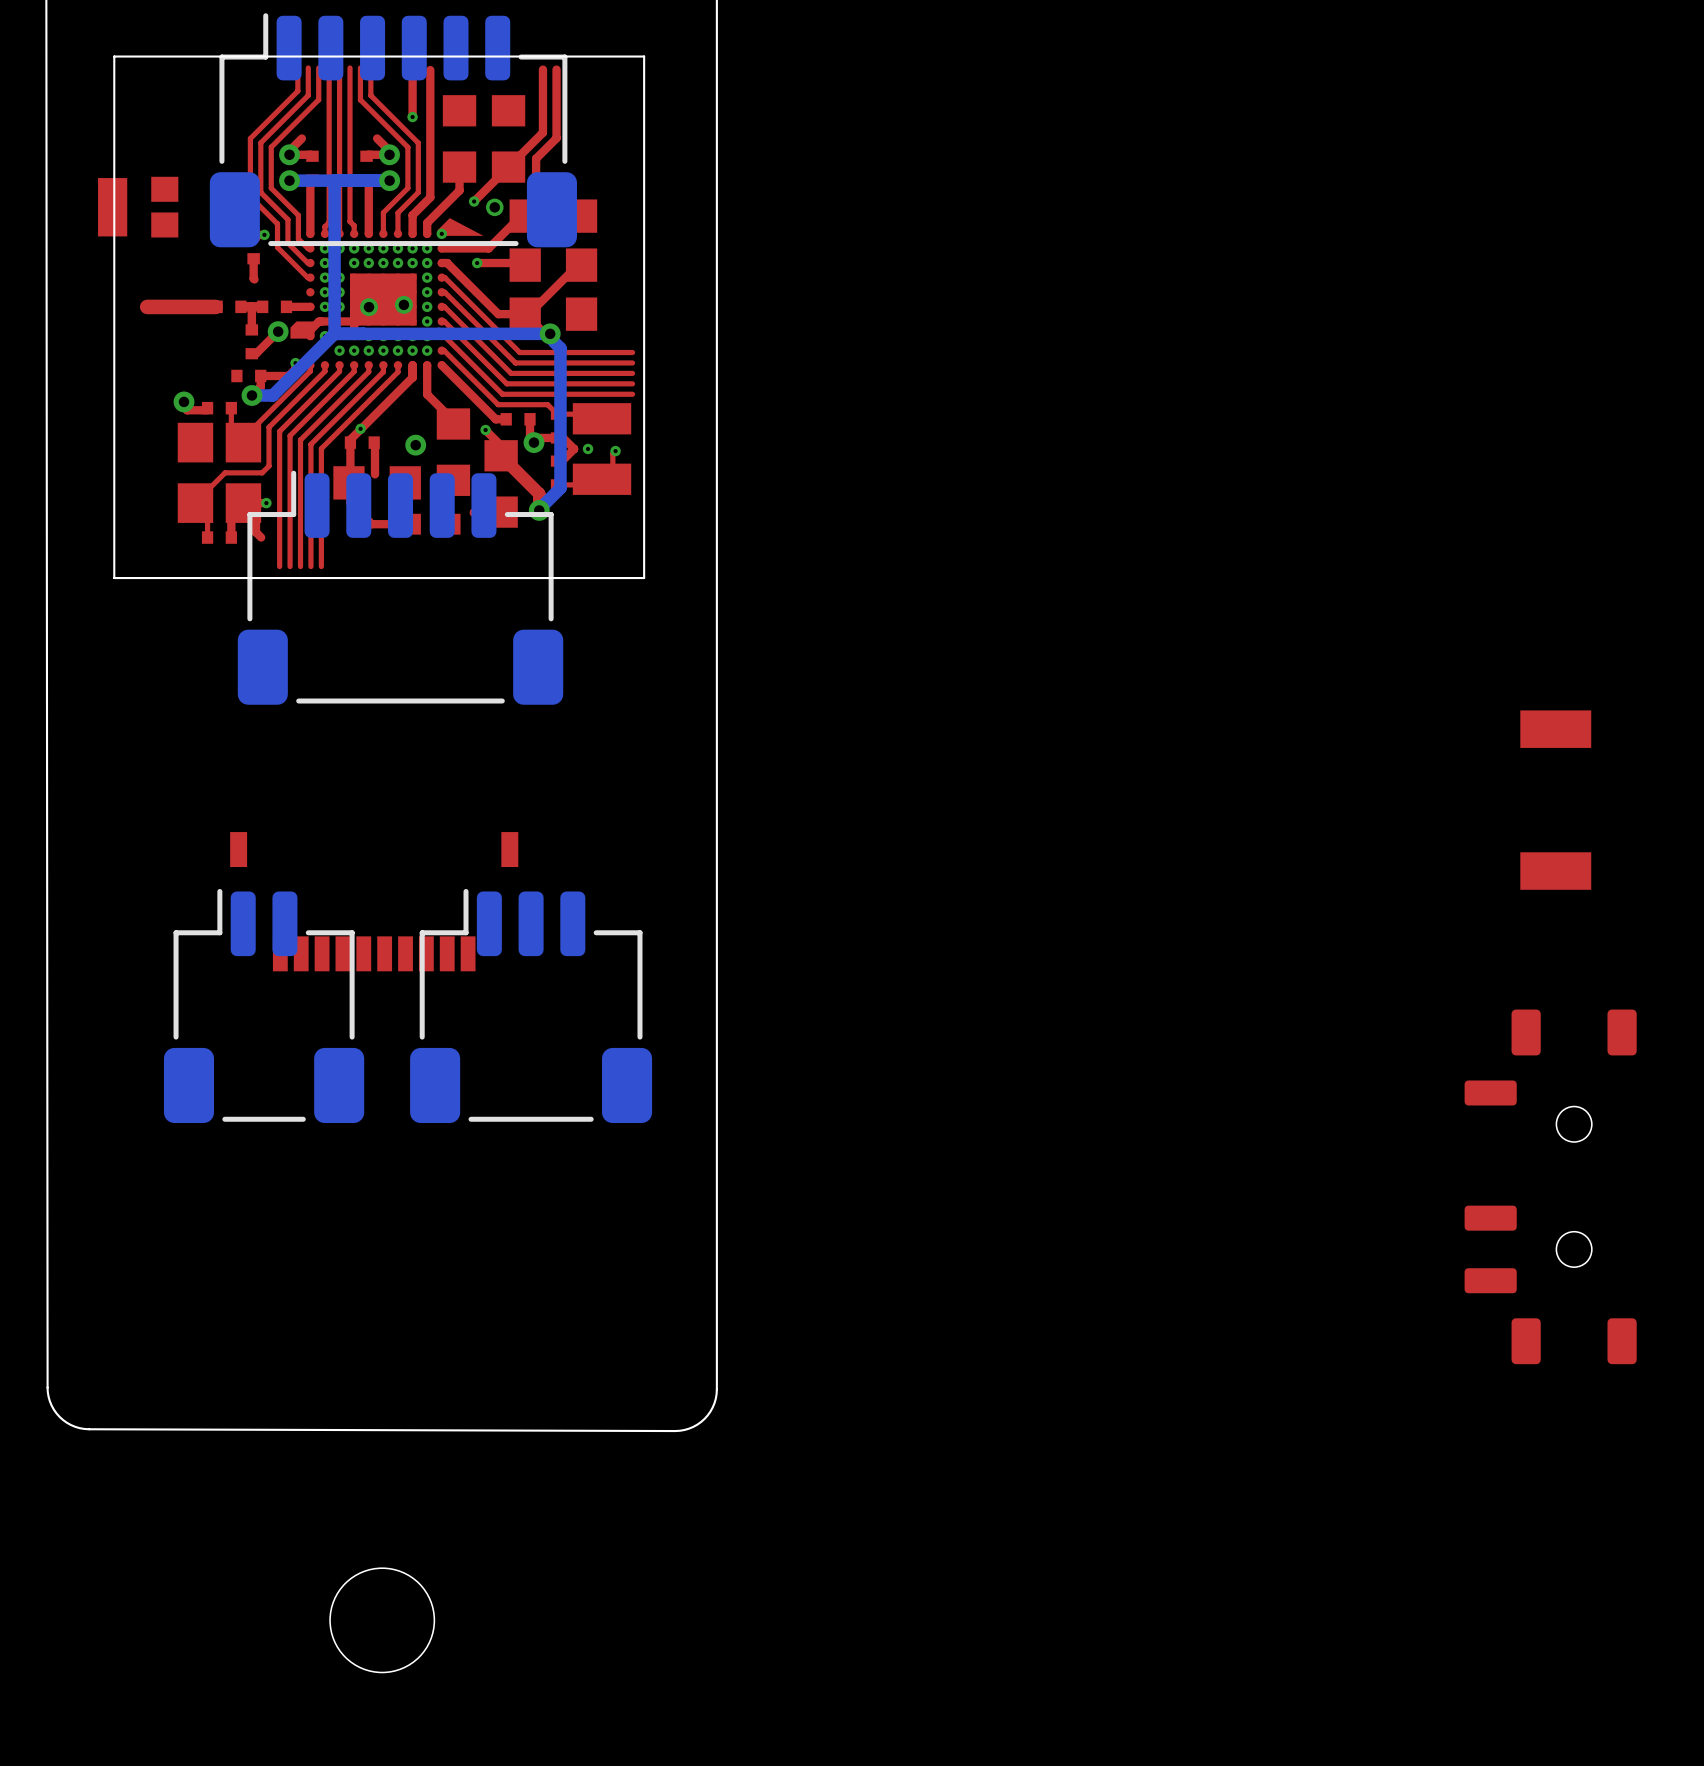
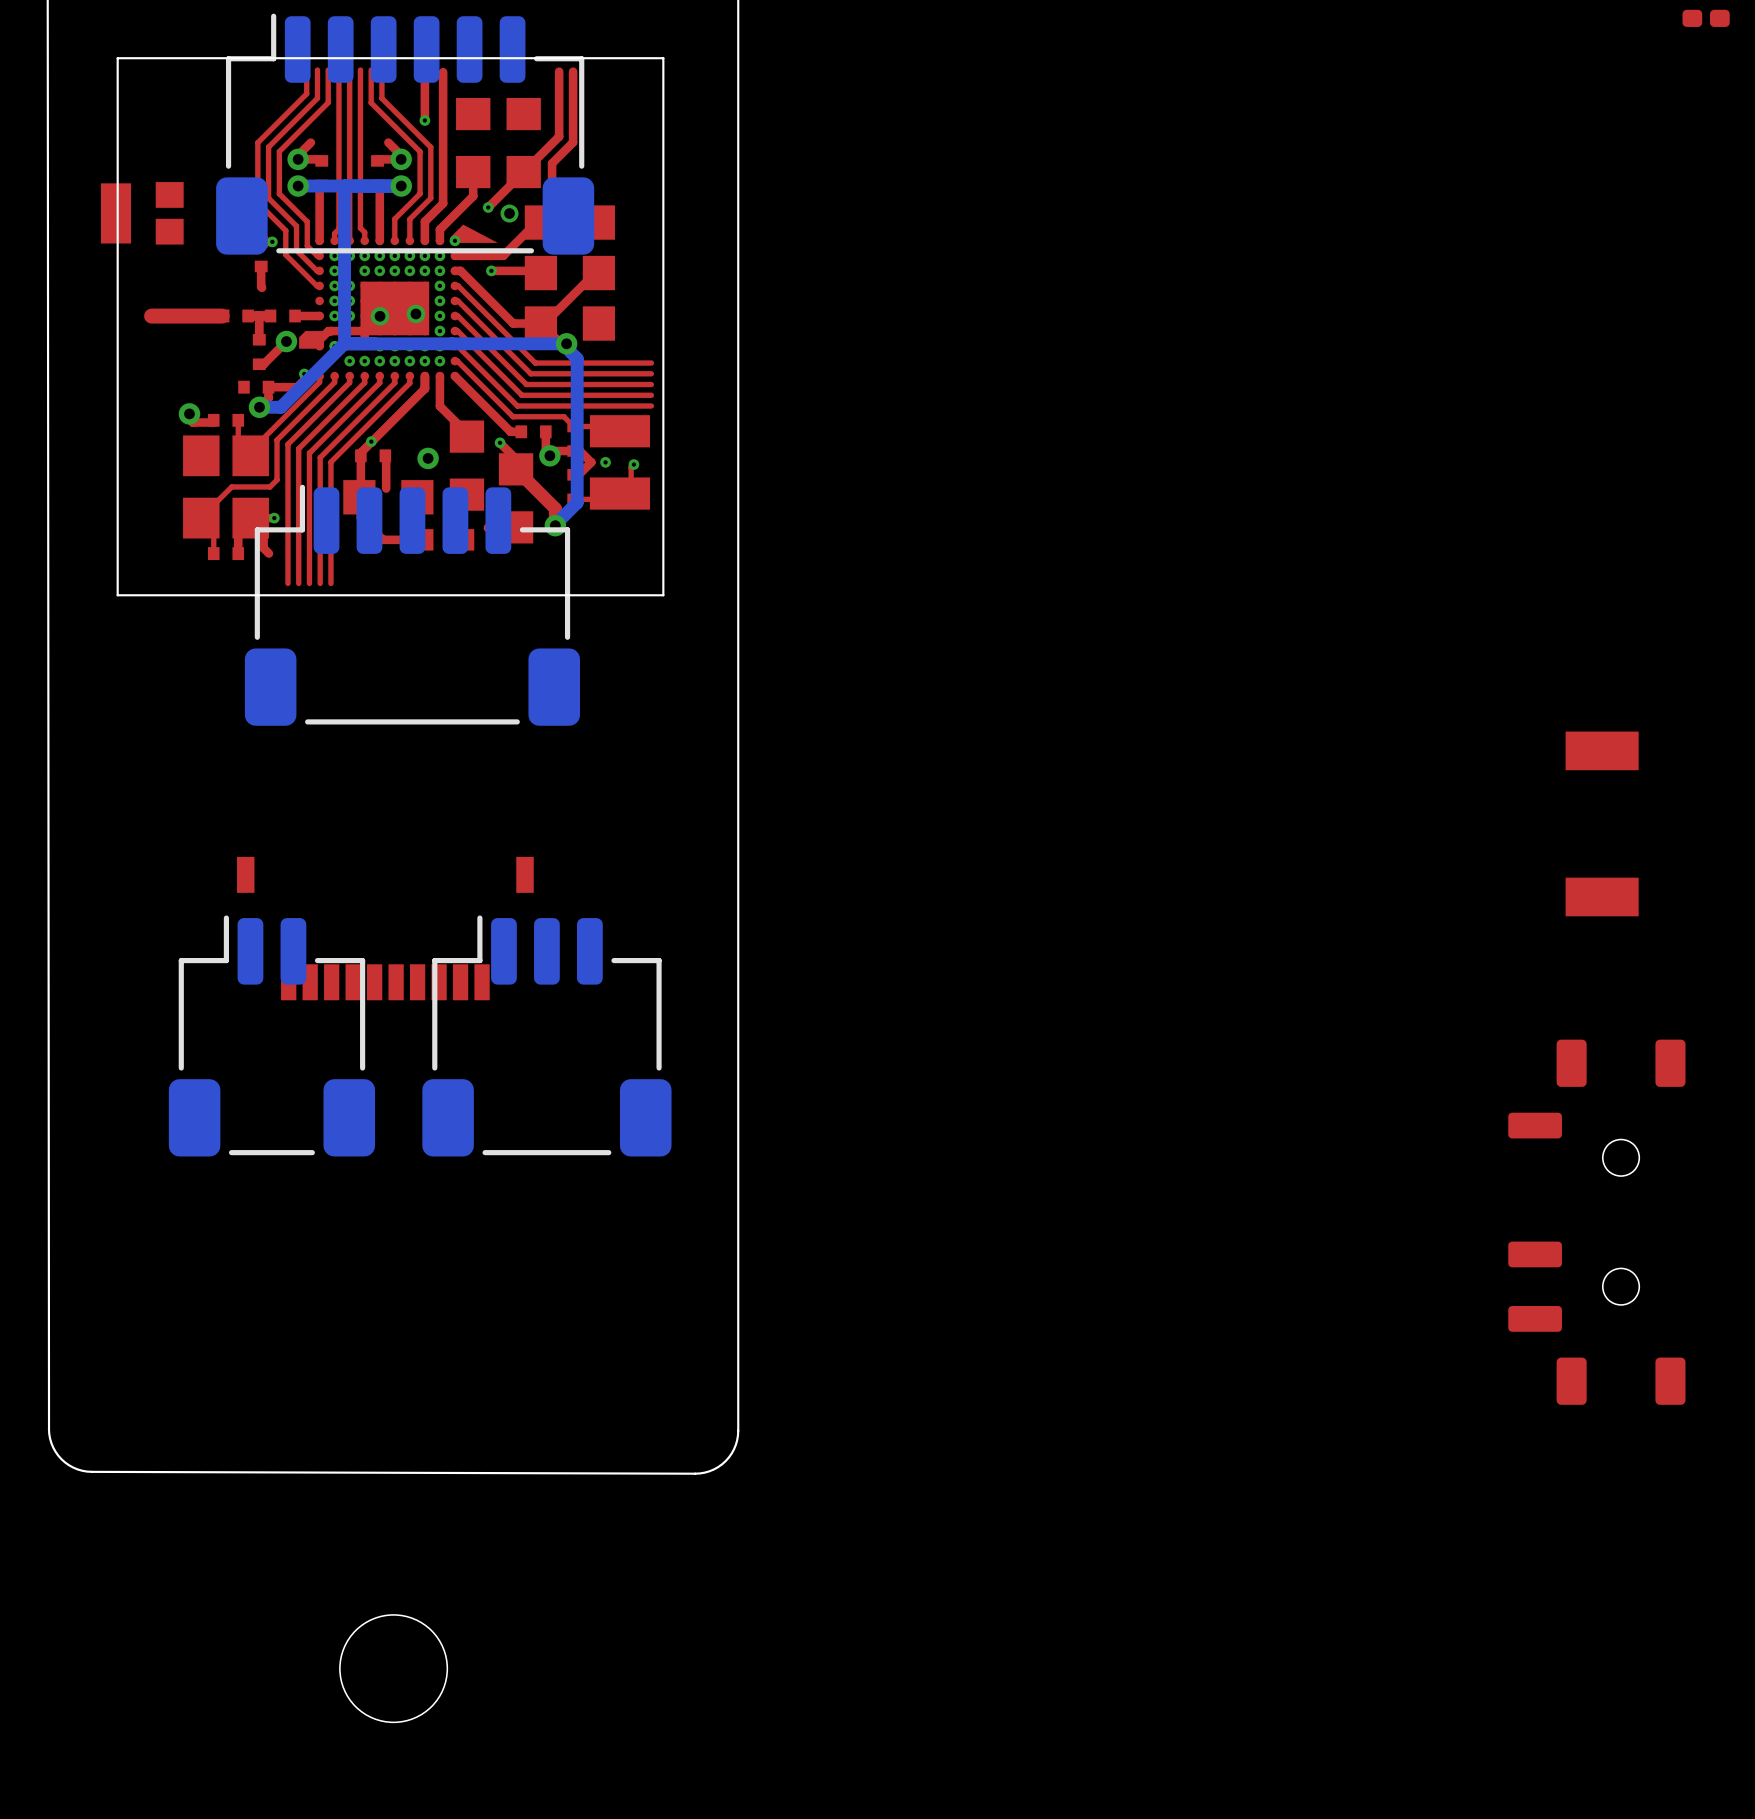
part: none -> (1706, 18)

